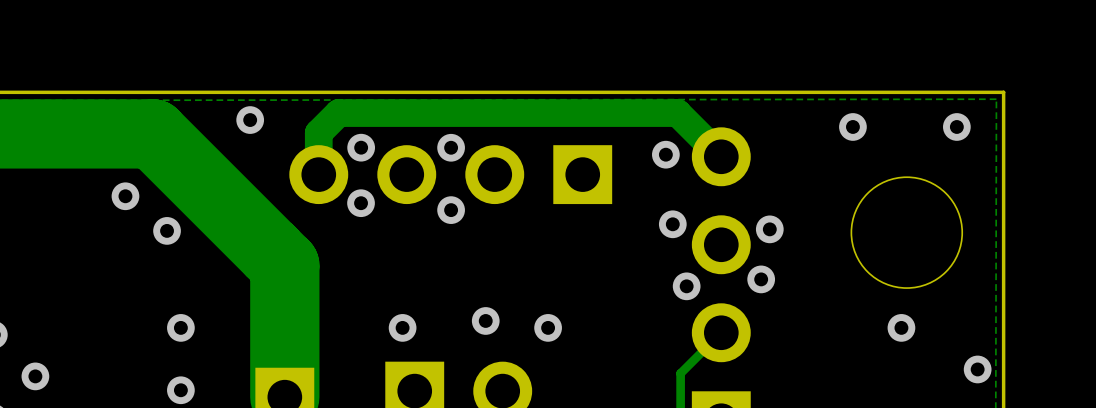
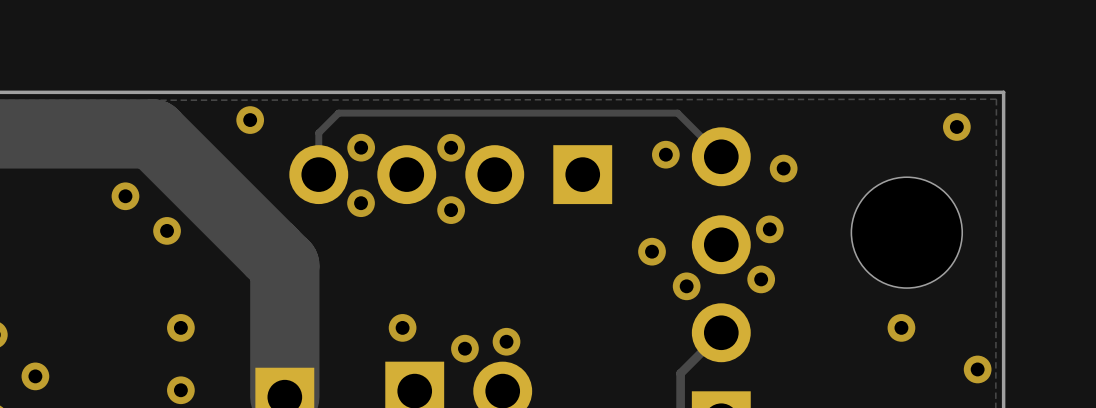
via: (852, 126) -> none
track width: thick (721, 156) (677, 113) (338, 113) (318, 132) (318, 174) -> thin (721, 156) (677, 113) (338, 113) (318, 132) (318, 174)
via: none -> (783, 168)
via position: (672, 224) -> (652, 251)
via: (485, 320) -> none
via: (548, 327) -> none
via: none -> (506, 341)
via: none -> (464, 348)

